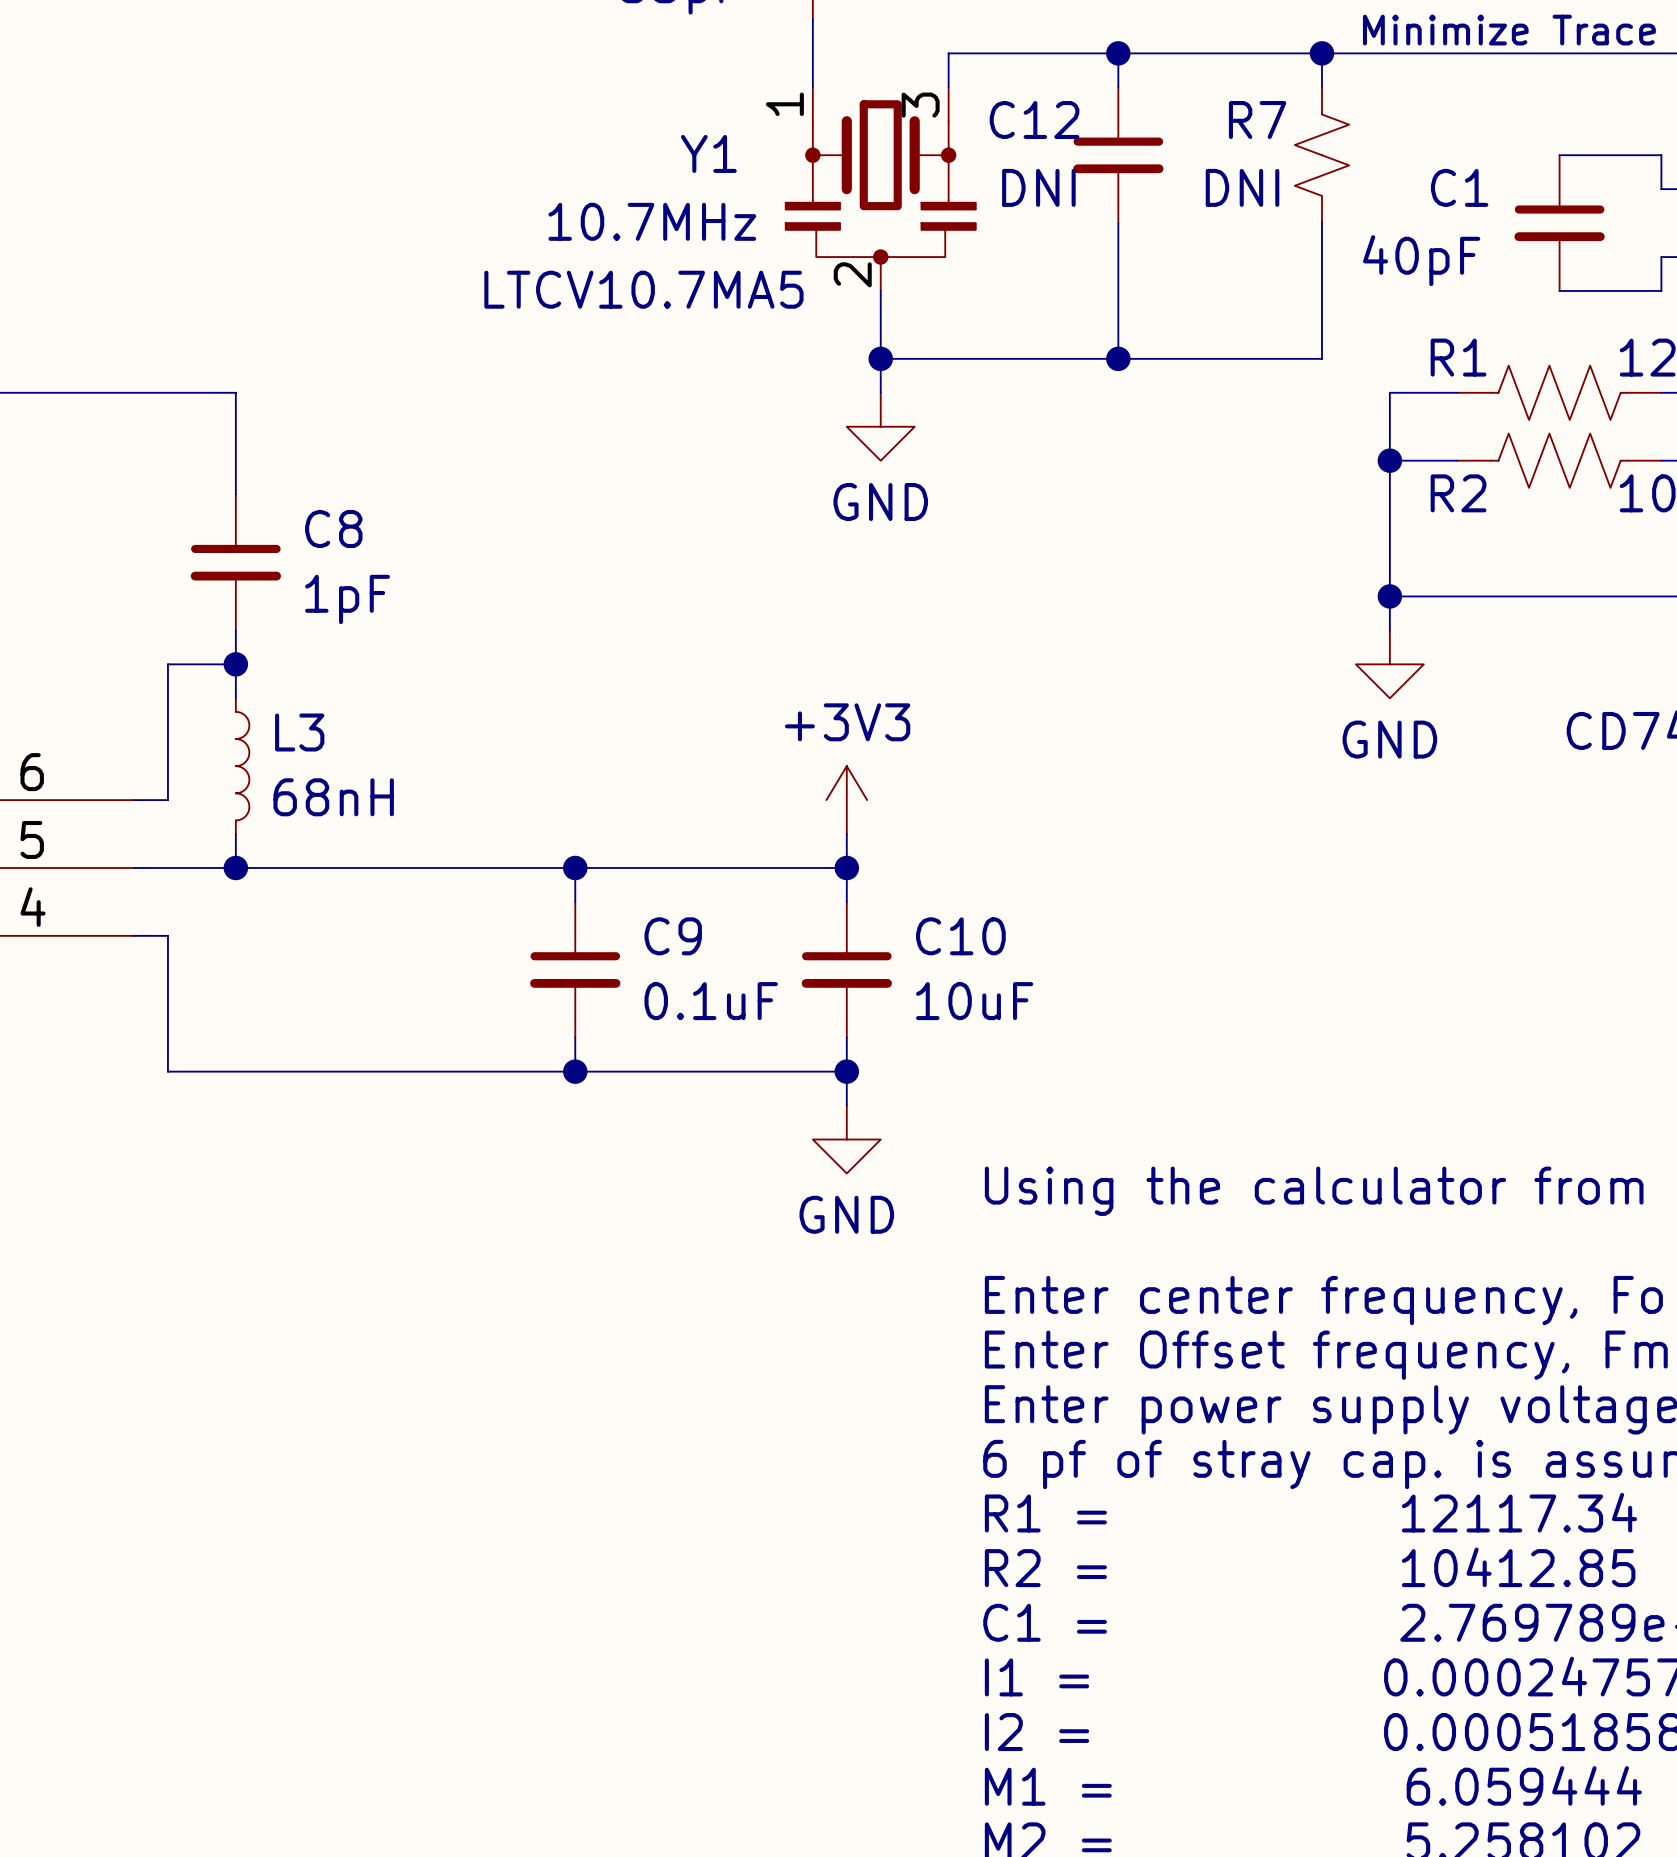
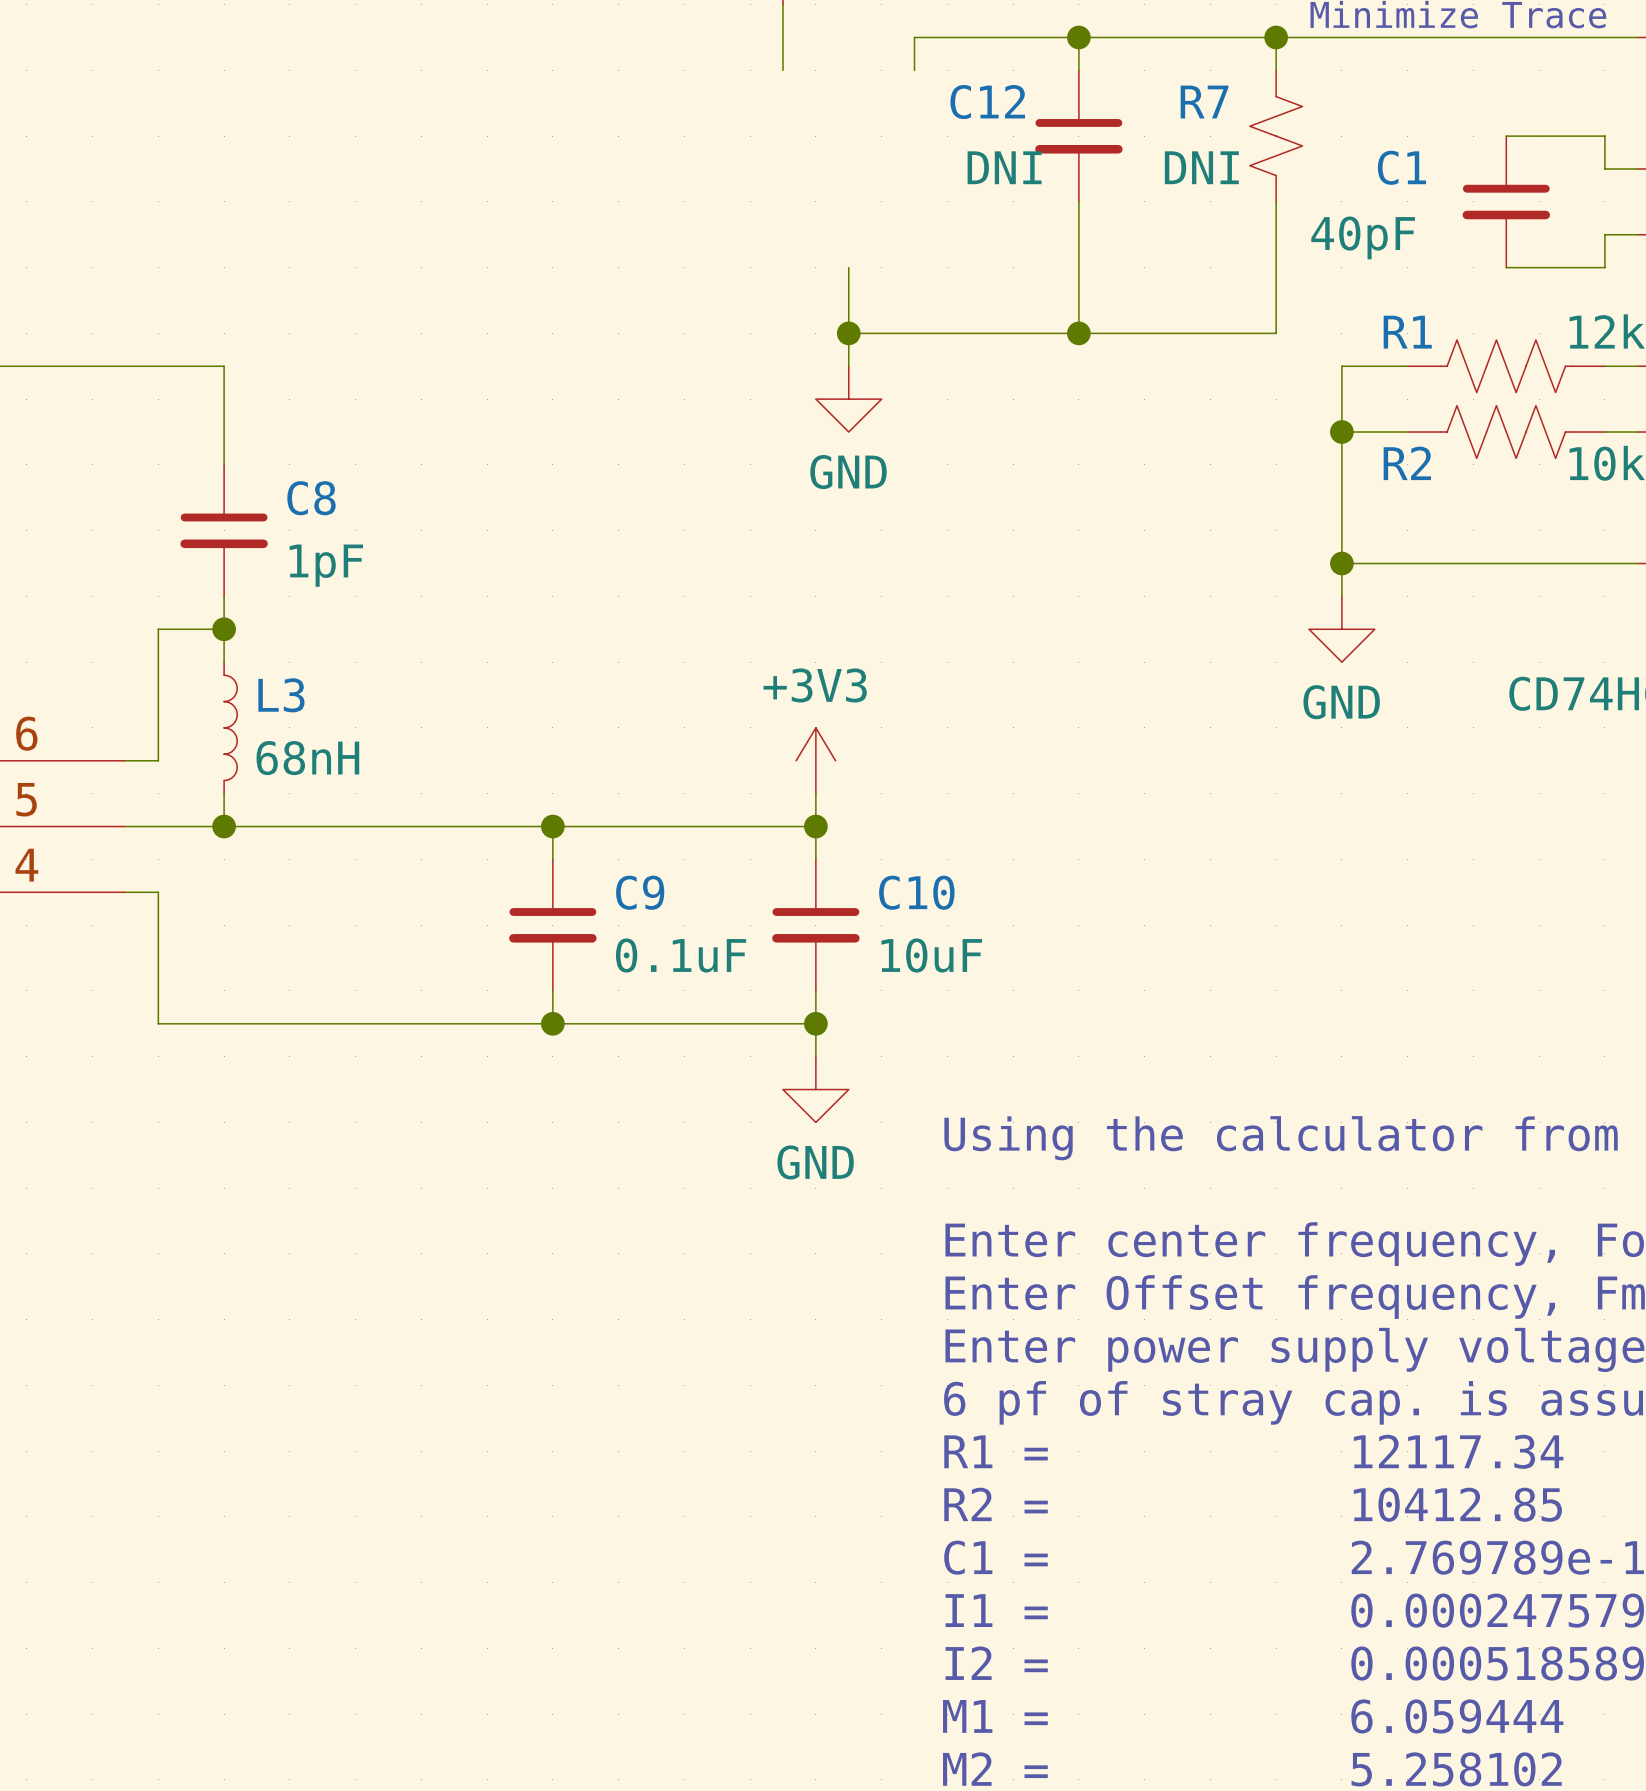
Y1: 10.7MHz (880, 189) -> none

